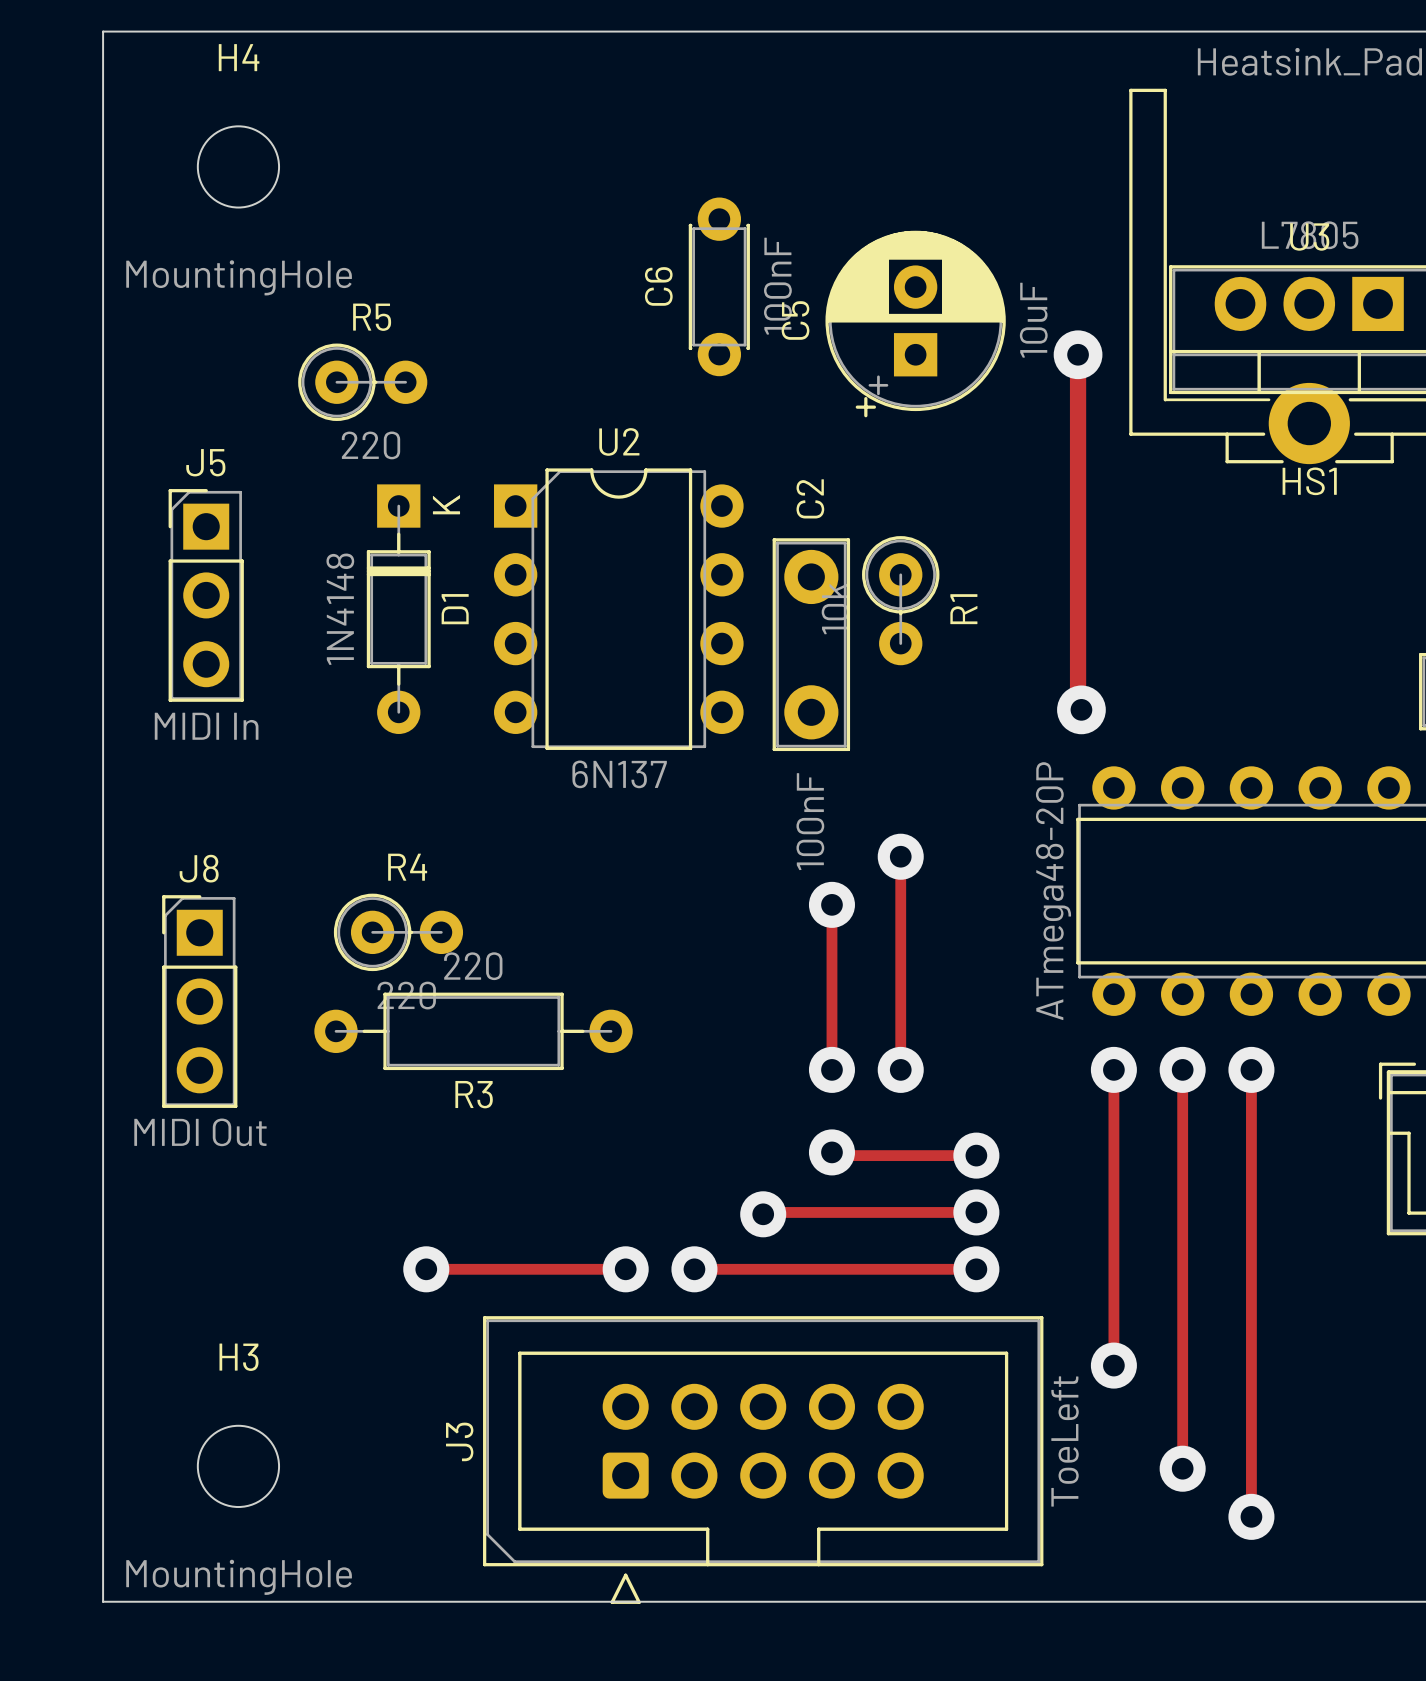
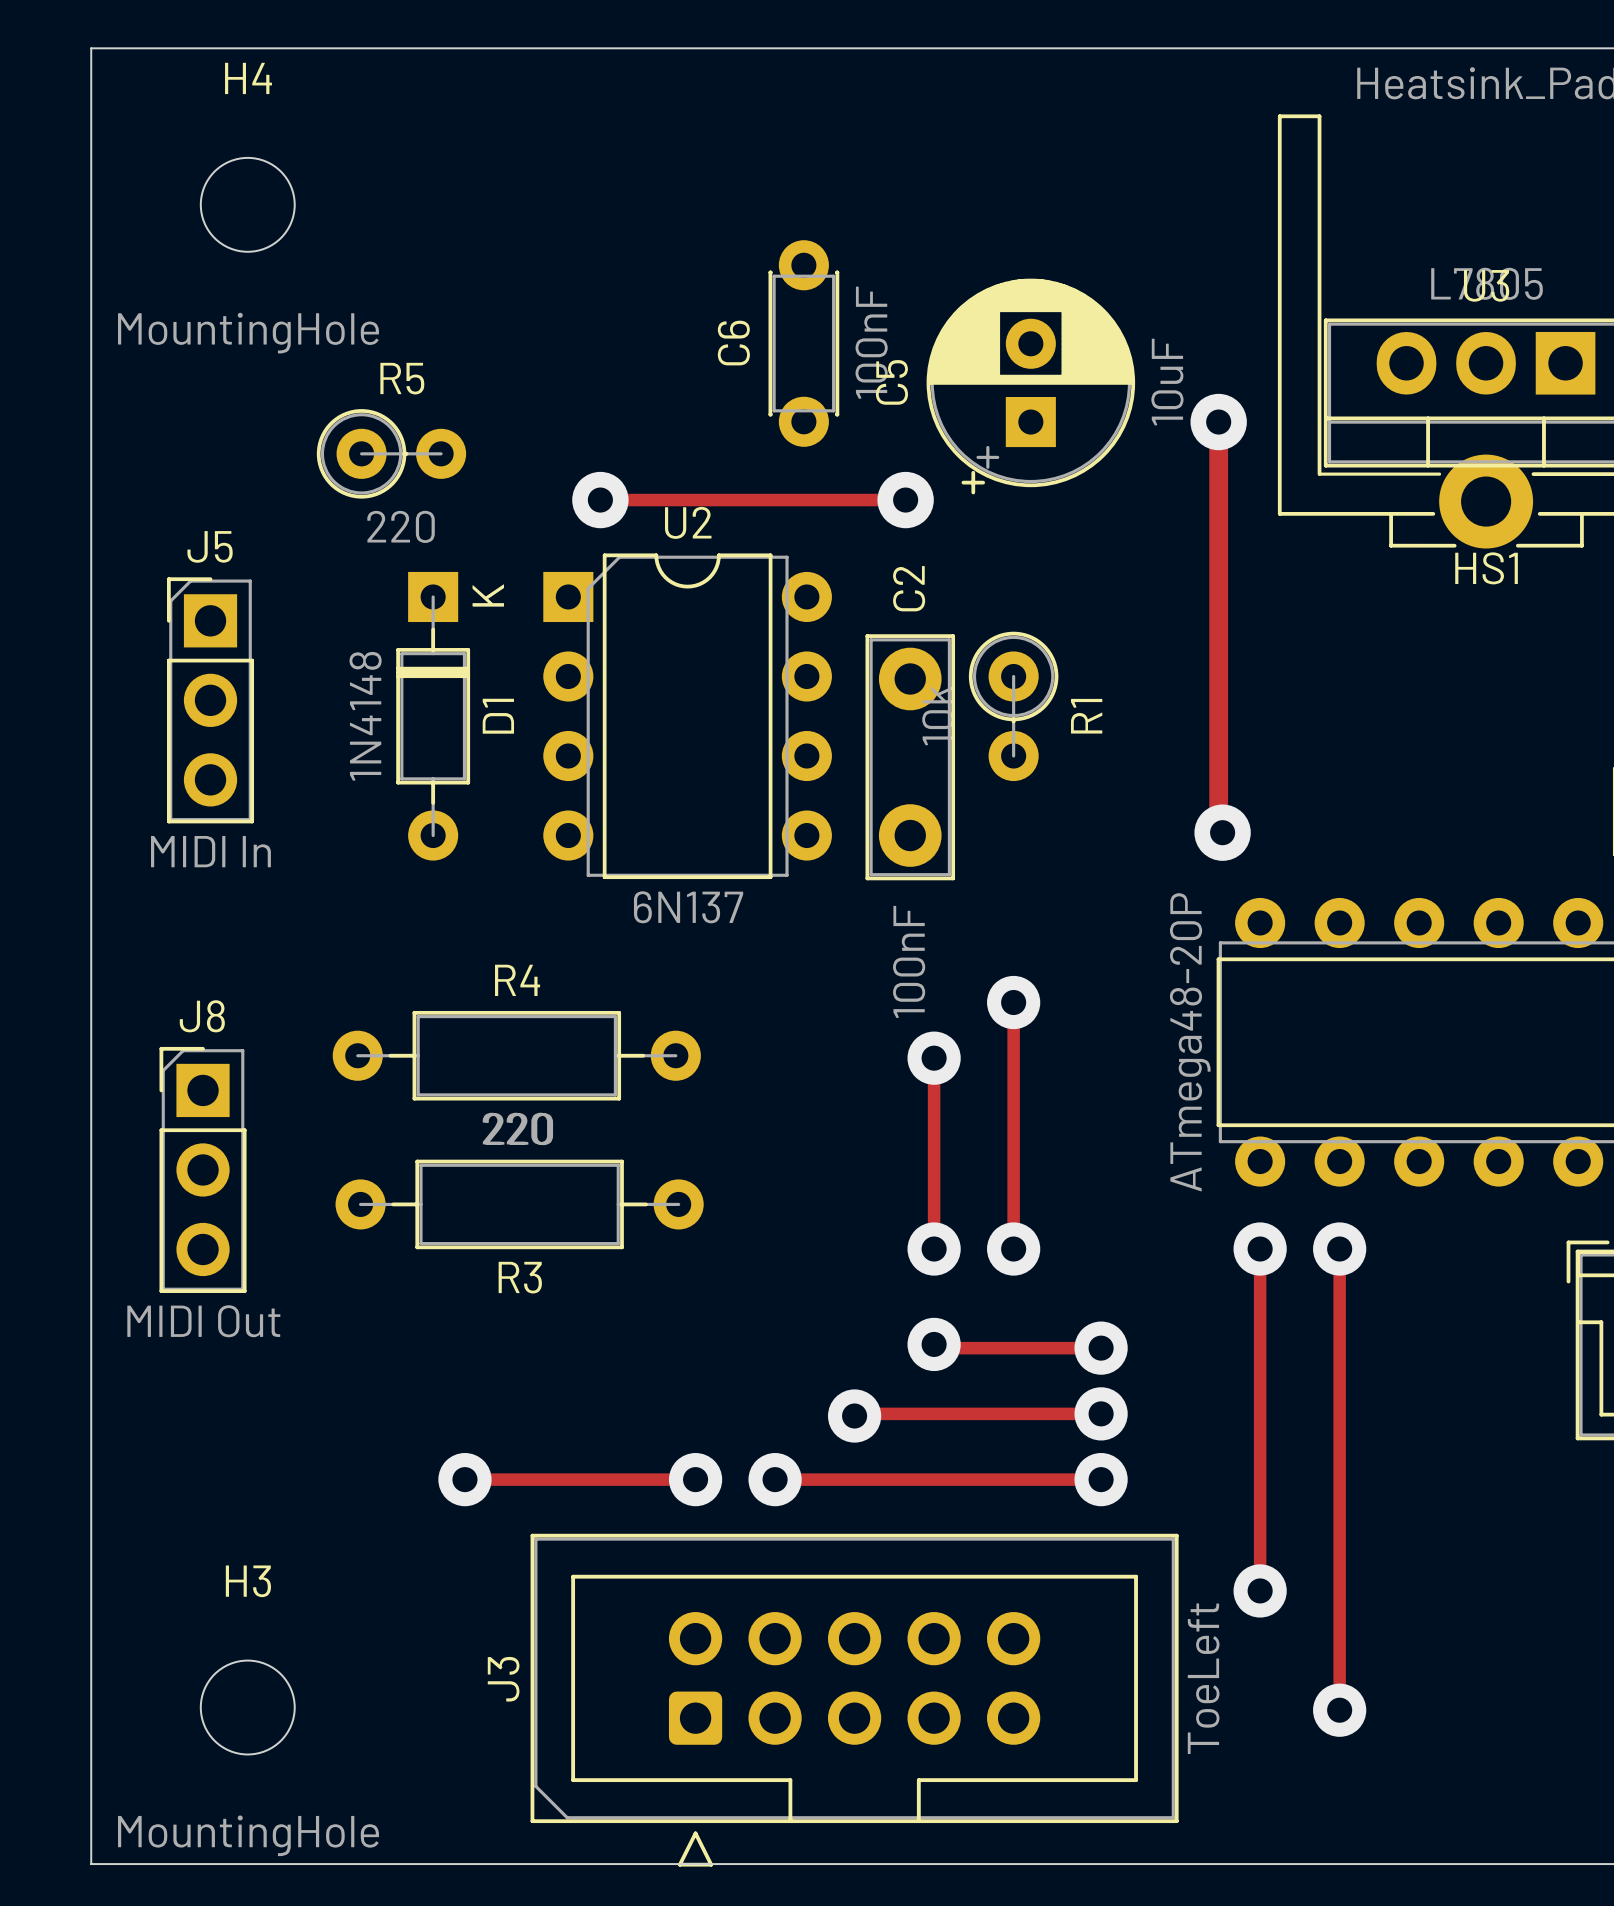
track: none -> (600, 500) (905, 500)
via: none -> (600, 500)
via: none -> (905, 500)
R4 footprint: [333, 893, 464, 972] -> [332, 1010, 701, 1101]
track: (1251, 1069) (1251, 1516) -> none
via: (1251, 1069) -> none
via: (1251, 1516) -> none

